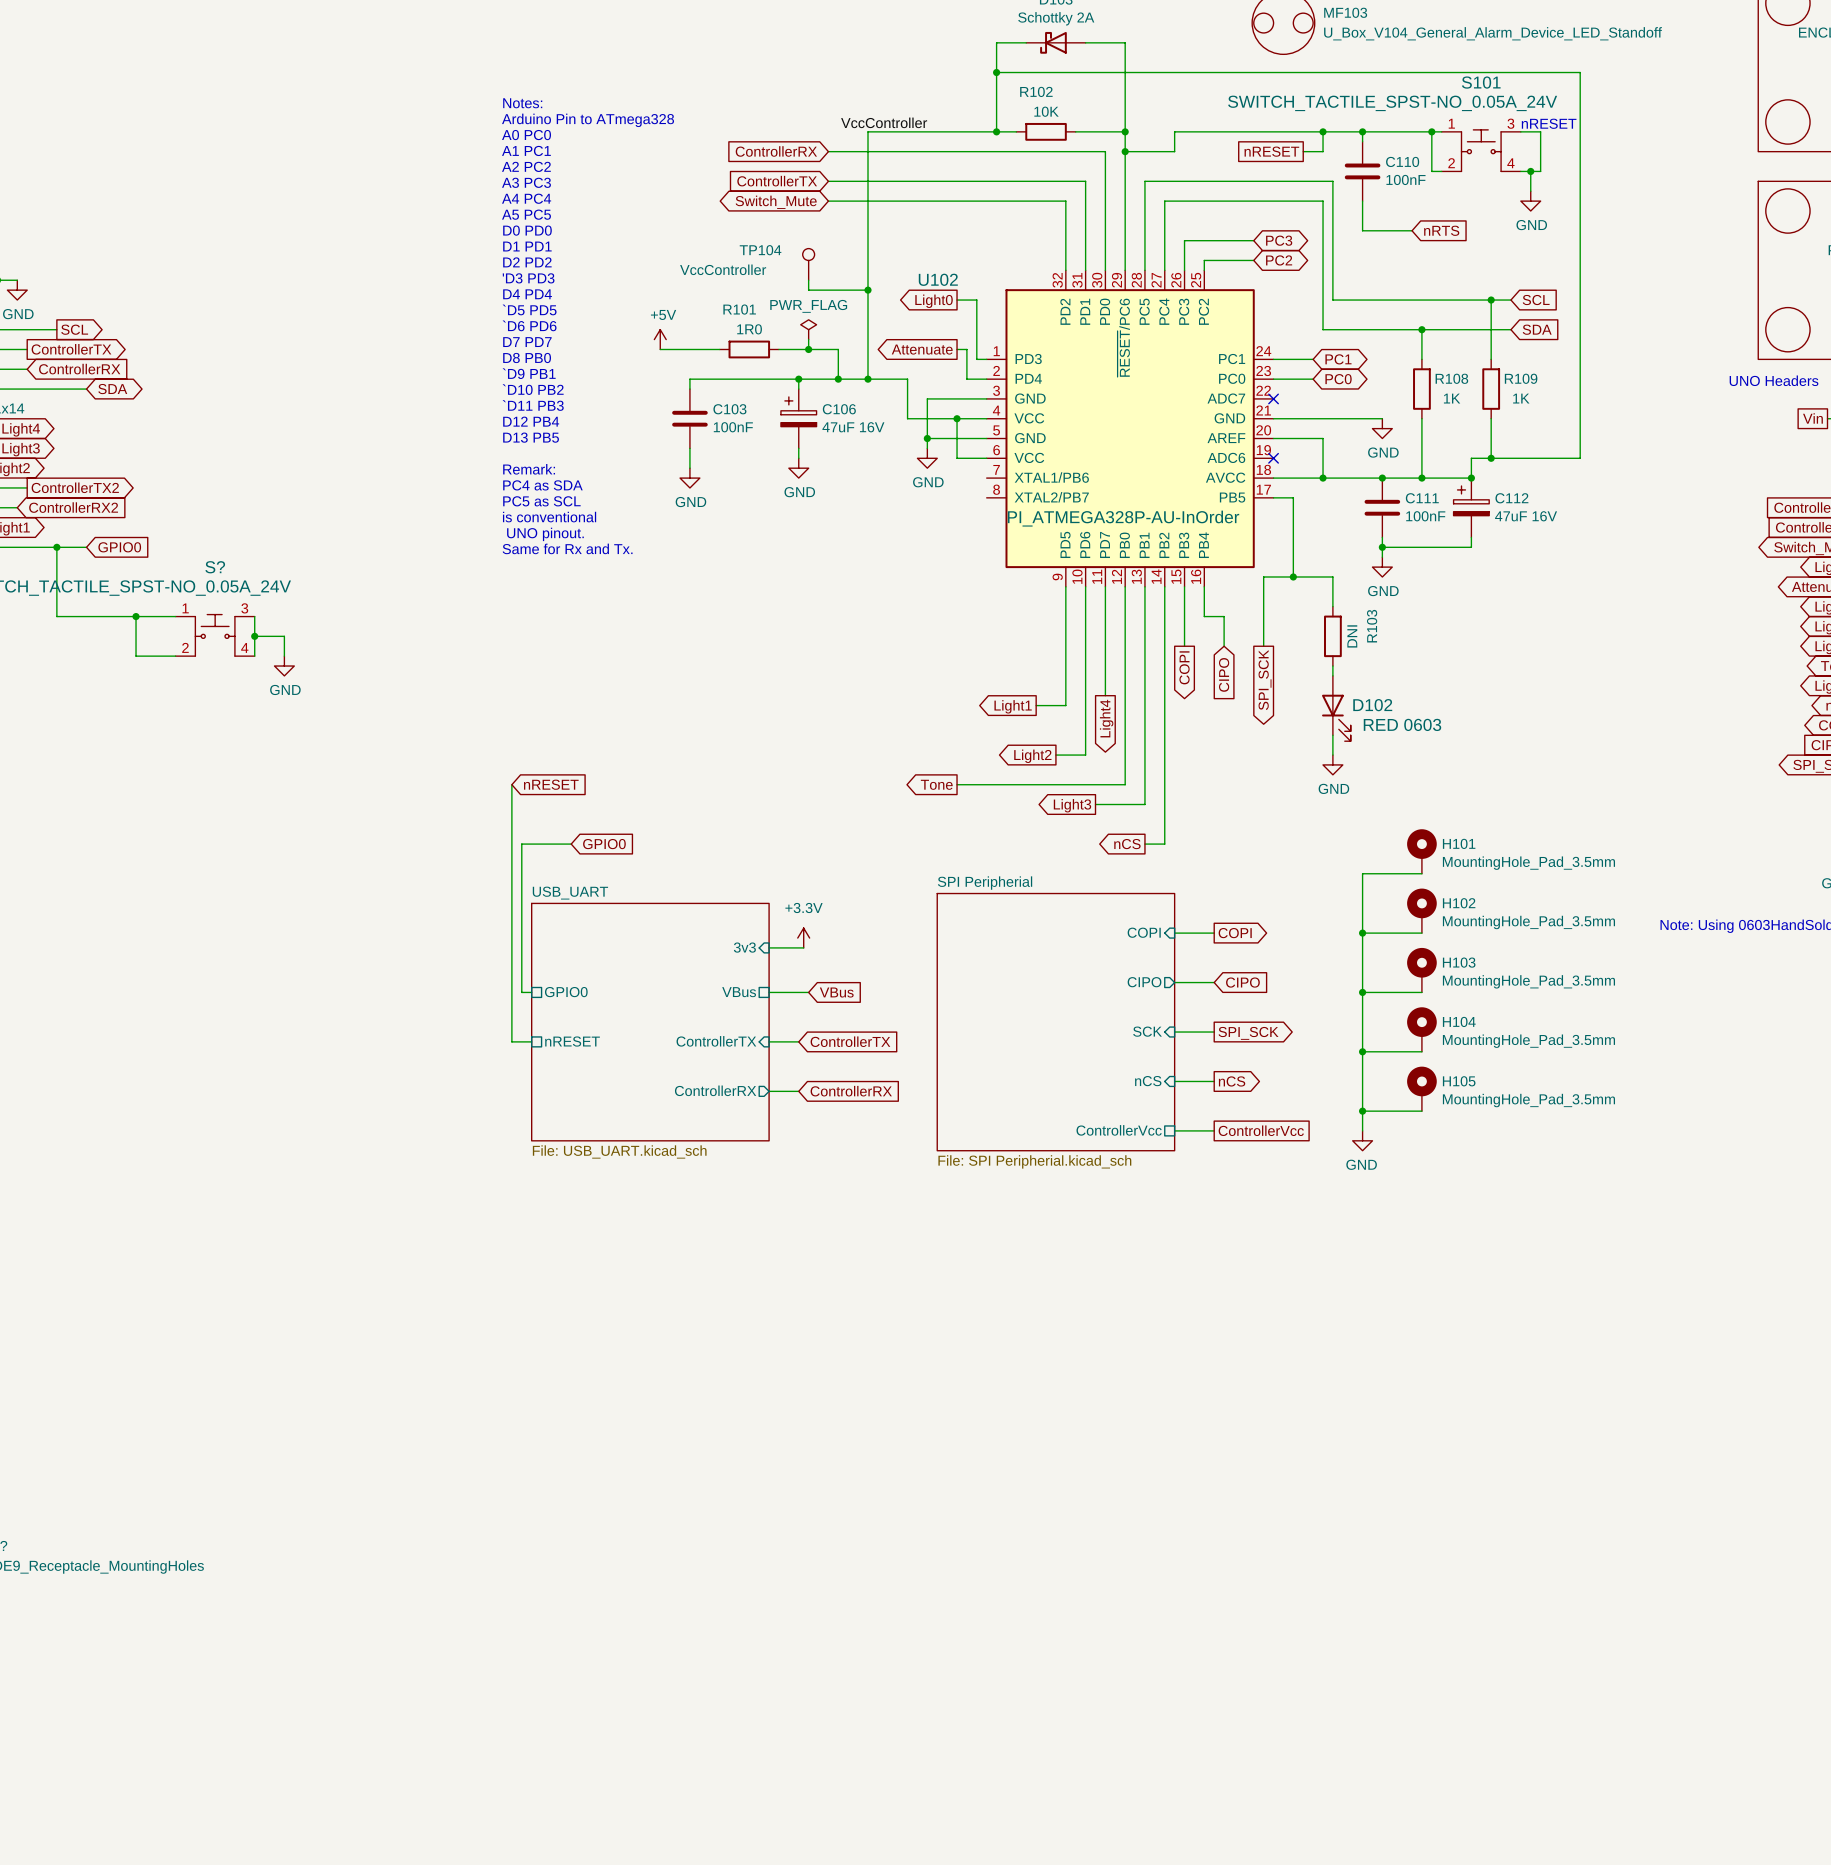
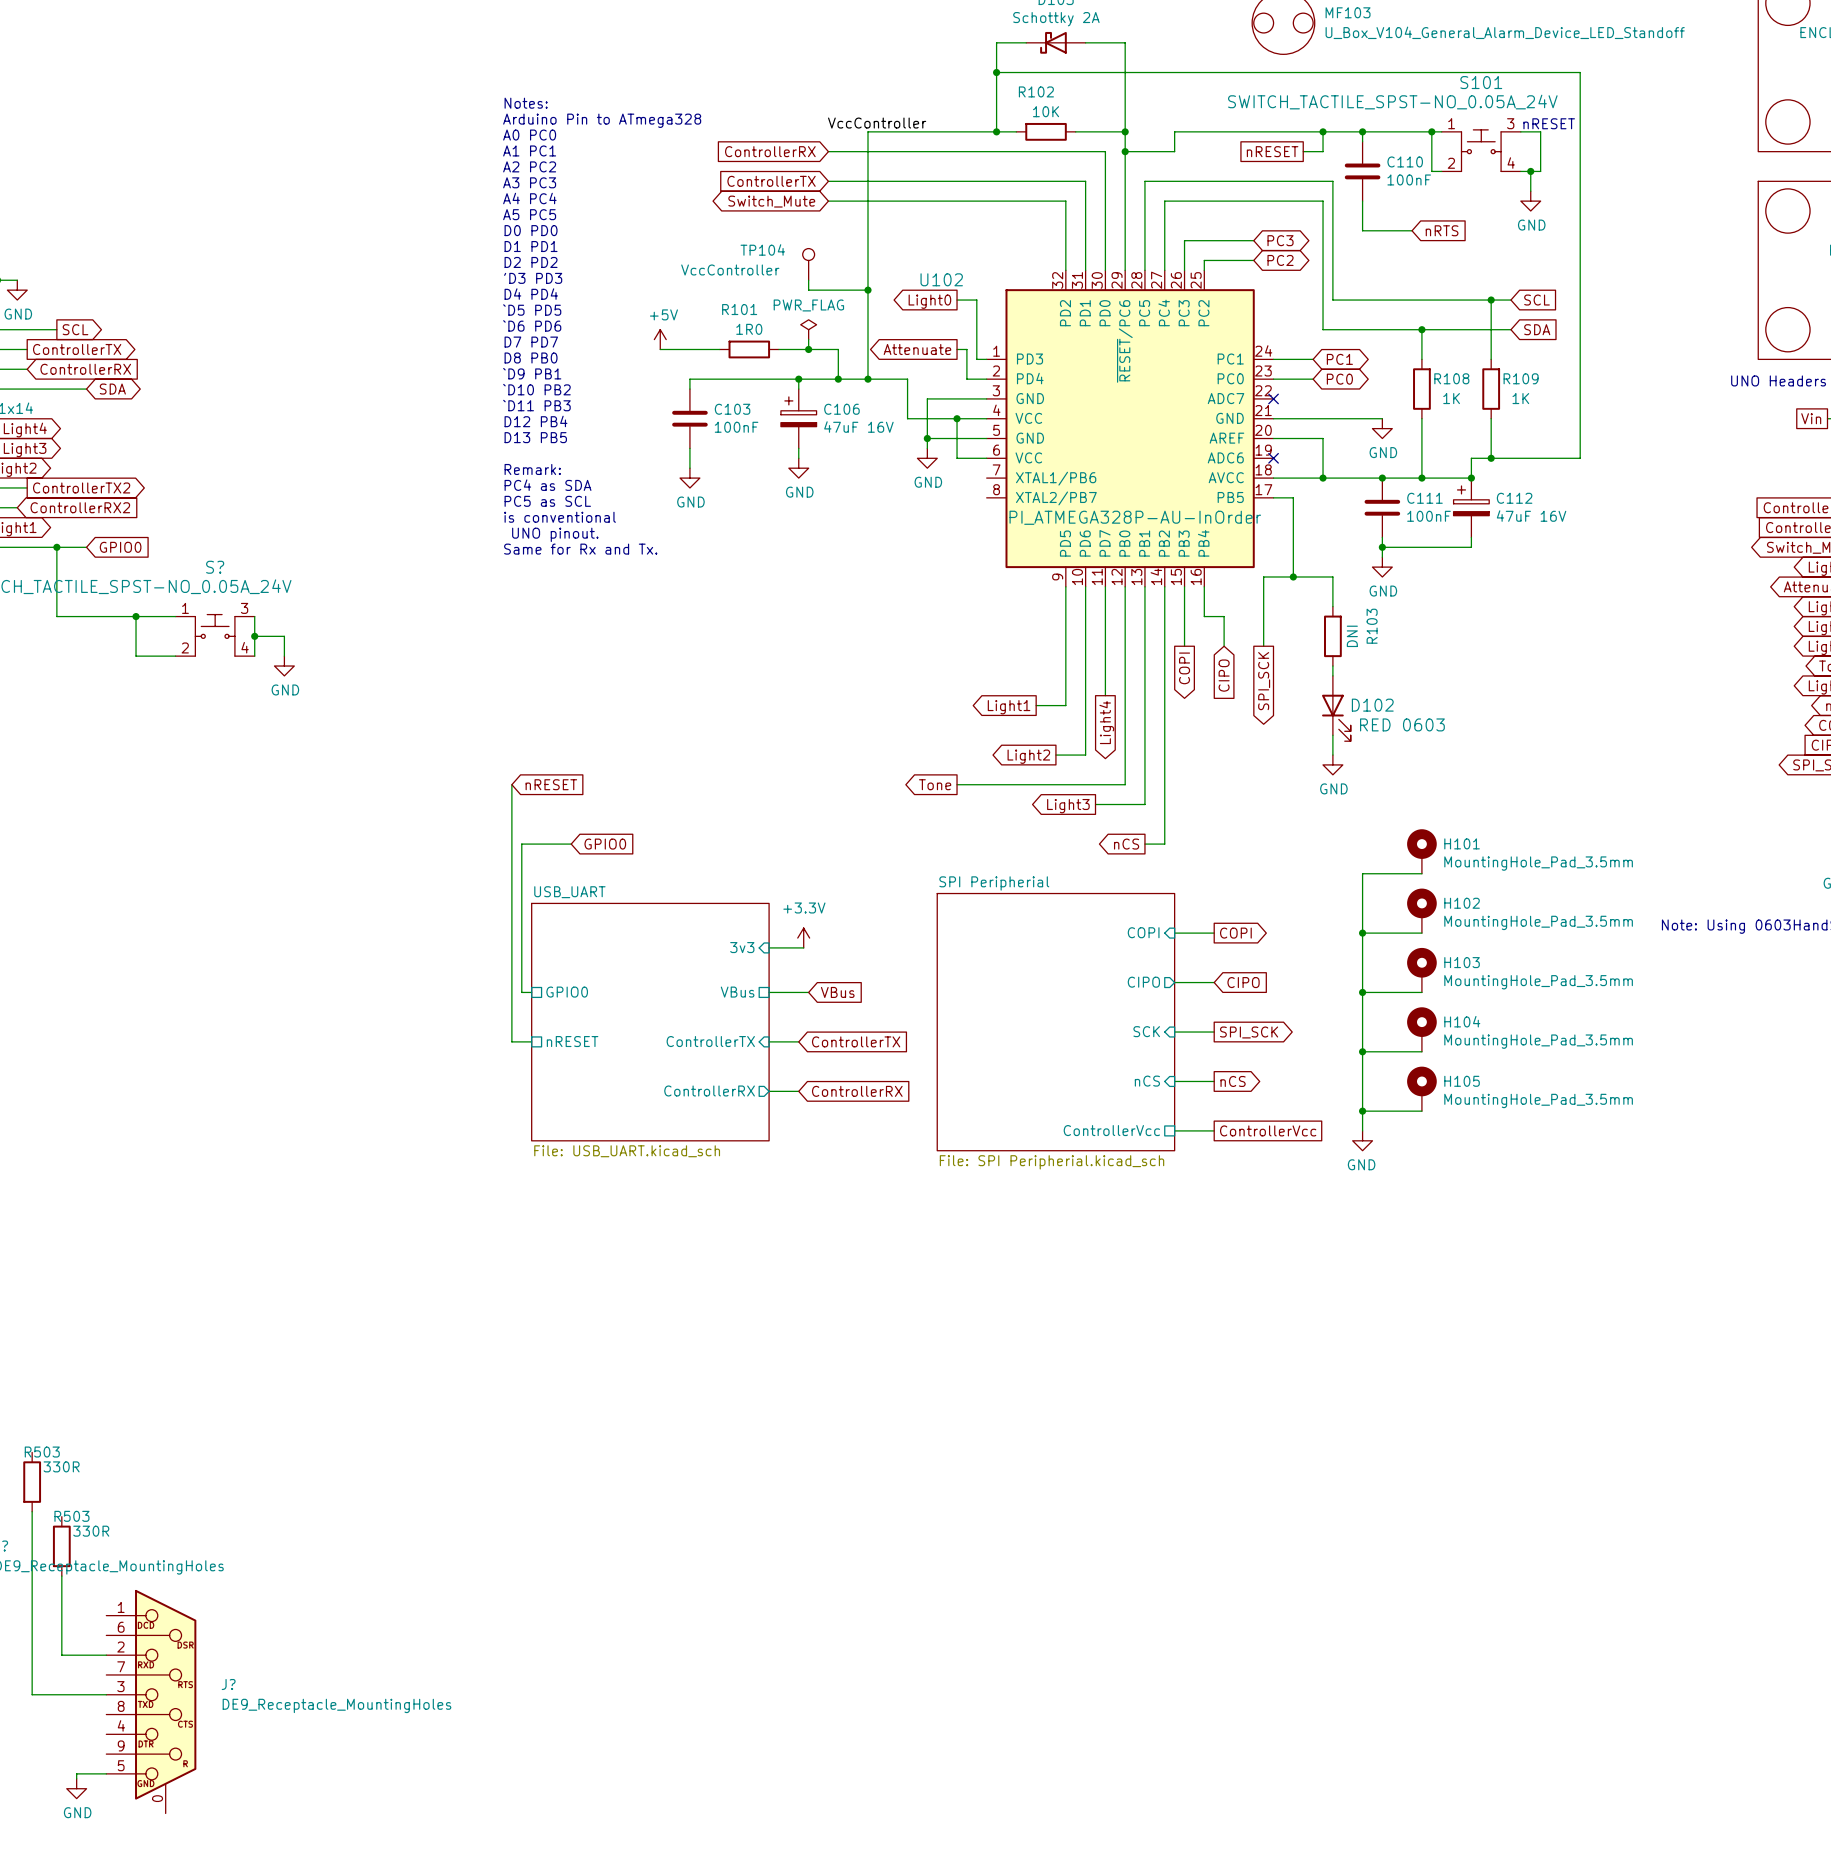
R503: none -> 330R (32, 1482)
wire: none -> (32, 1511) (32, 1694) (106, 1694)
R503: none -> 330R (61, 1546)
wire: none -> (61, 1576) (61, 1655) (106, 1655)
J?: none -> DE9_Receptacle_MountingHoles (151, 1701)
wire: none -> (106, 1773) (76, 1773) (76, 1778)
power symbol: none -> GND (76, 1788)

